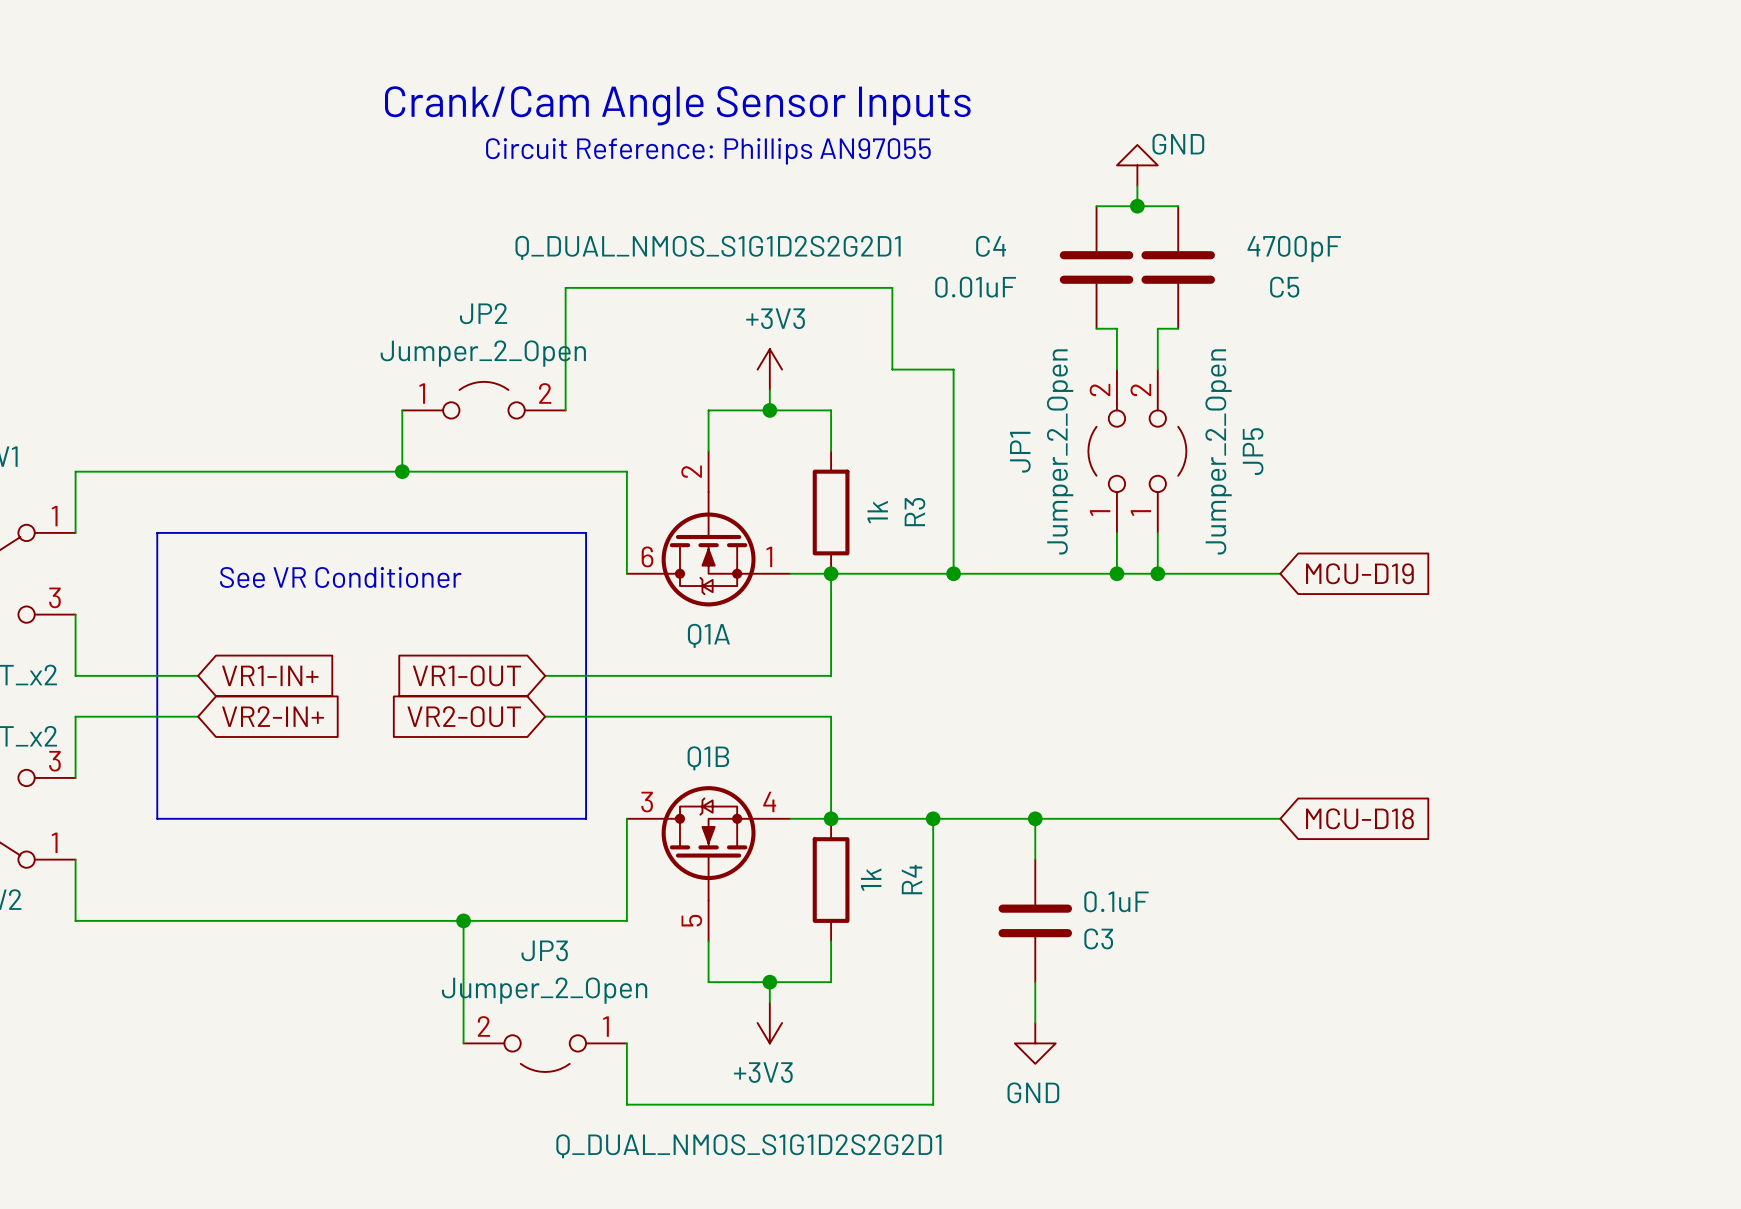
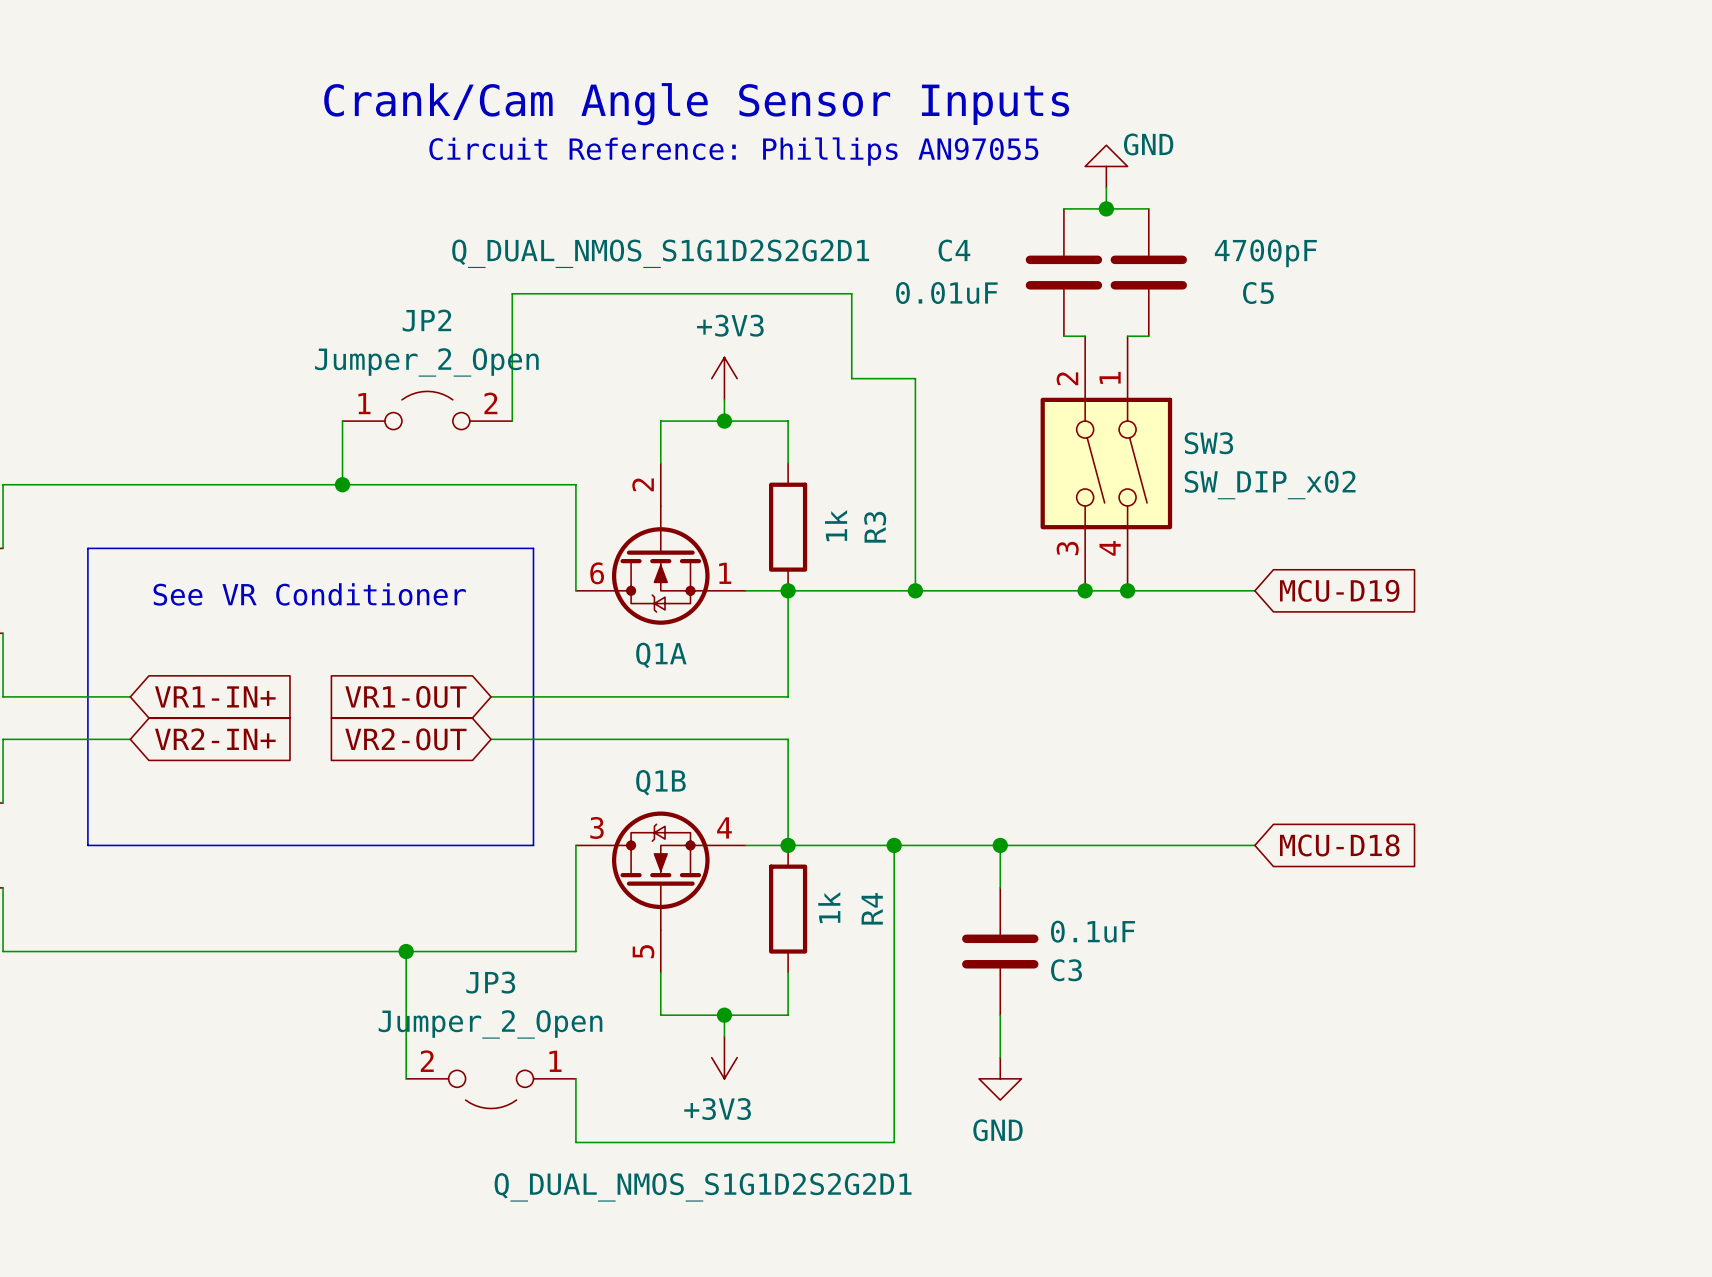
JP1: Jumper_2_Open (1106, 451) -> none
SW3: none -> SW_DIP_x02 (1106, 463)
JP5: Jumper_2_Open (1168, 451) -> none

